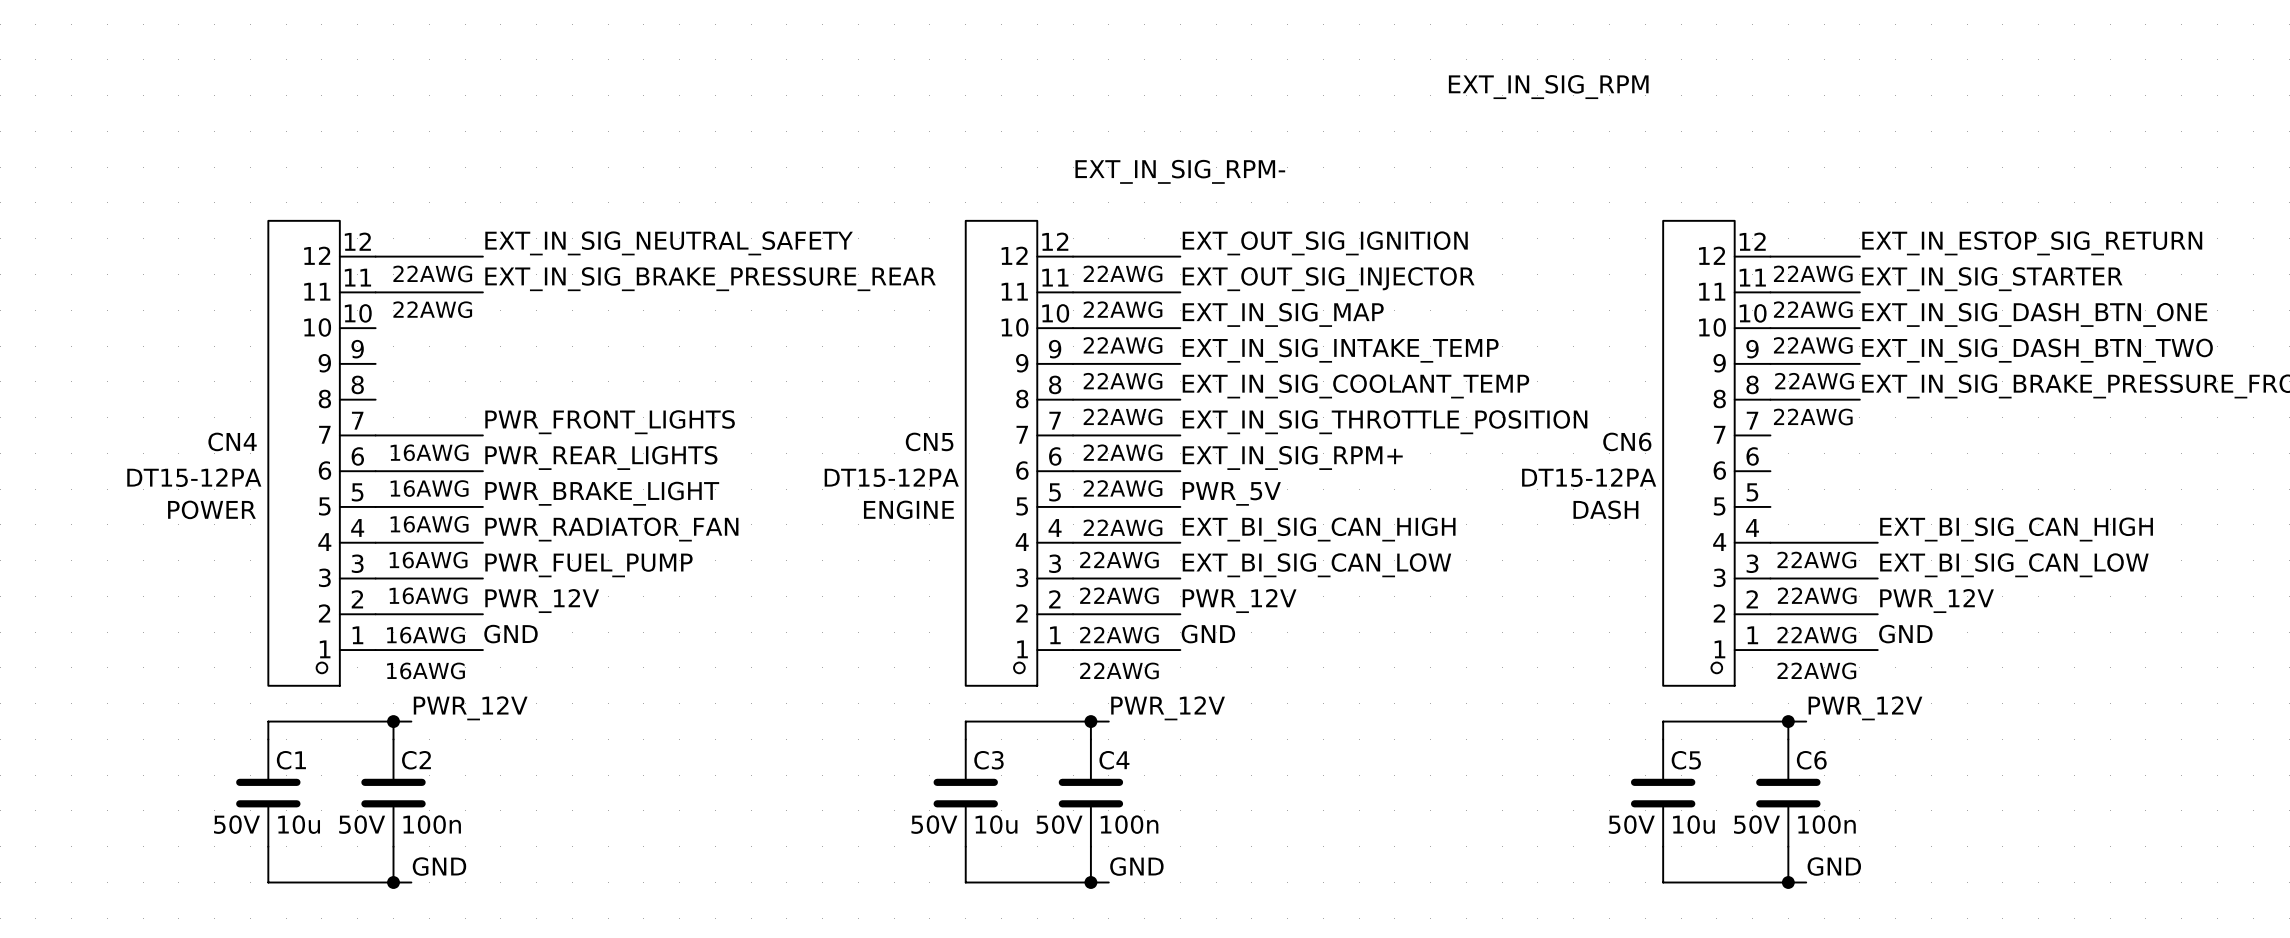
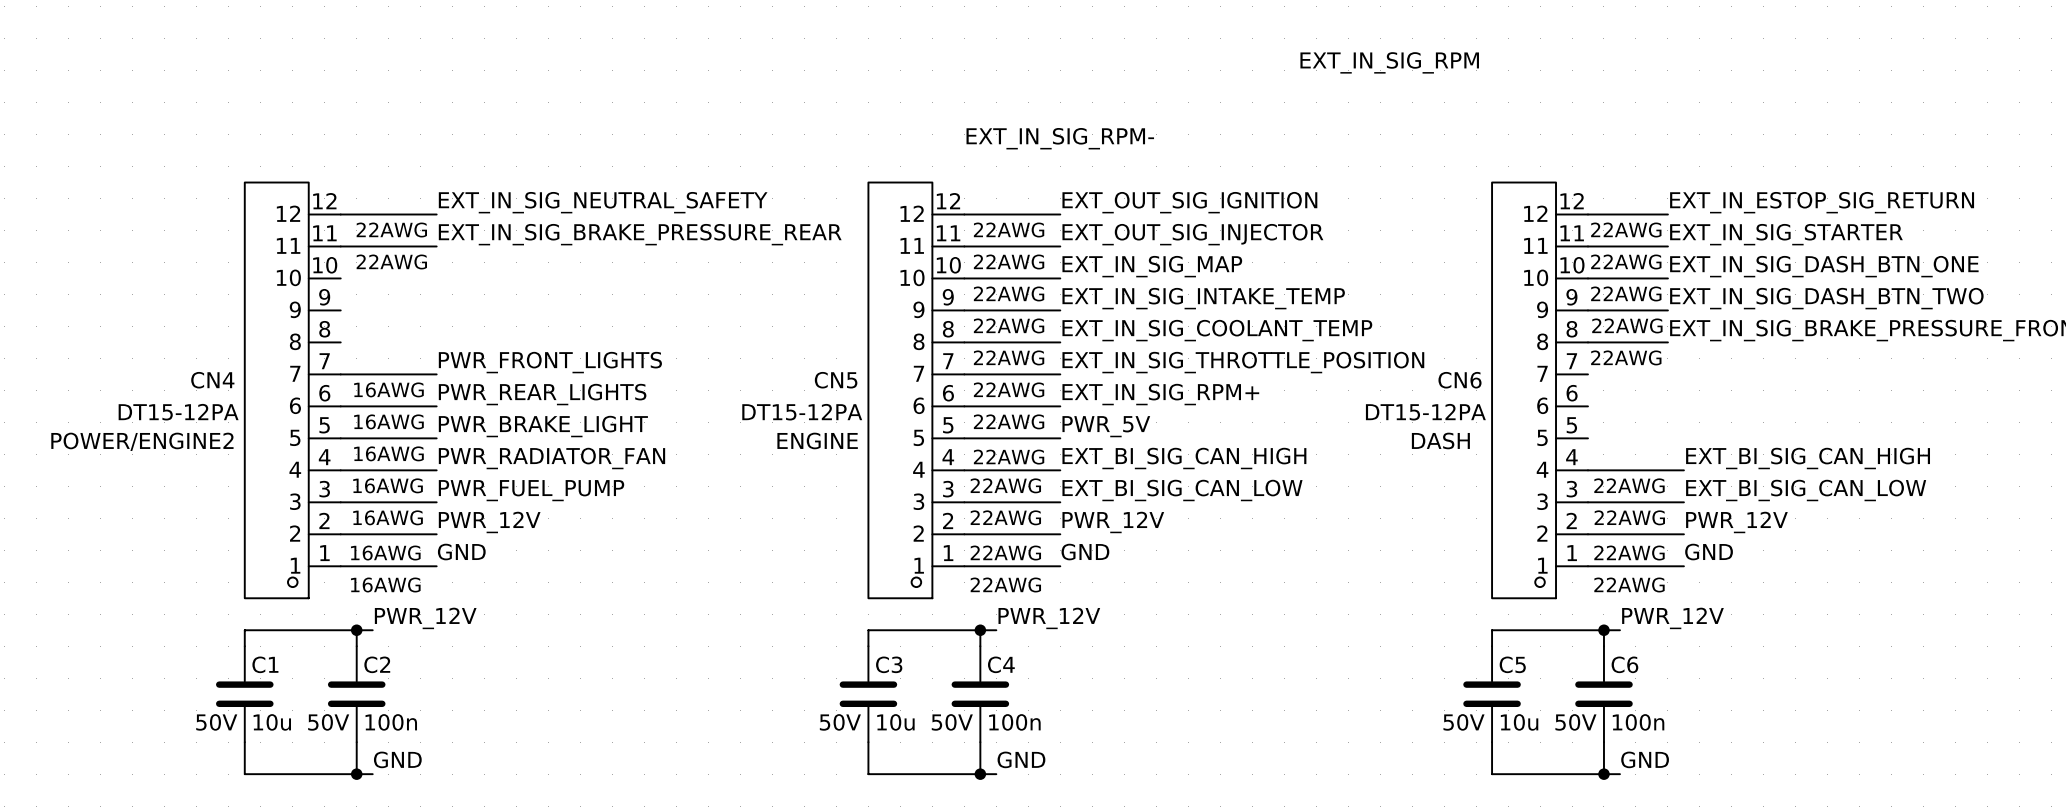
CN4 text: POWER (211, 509) -> POWER/ENGINE2 (142, 441)

